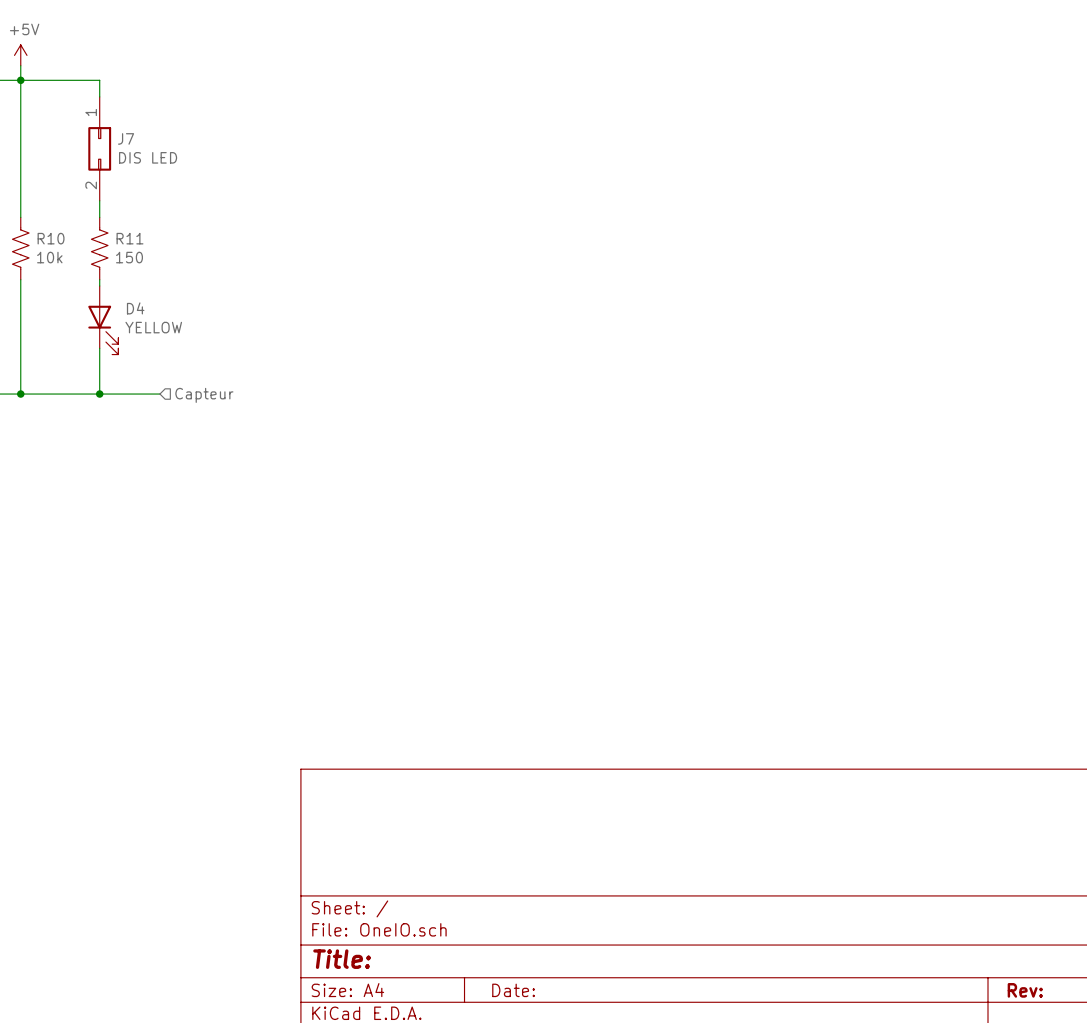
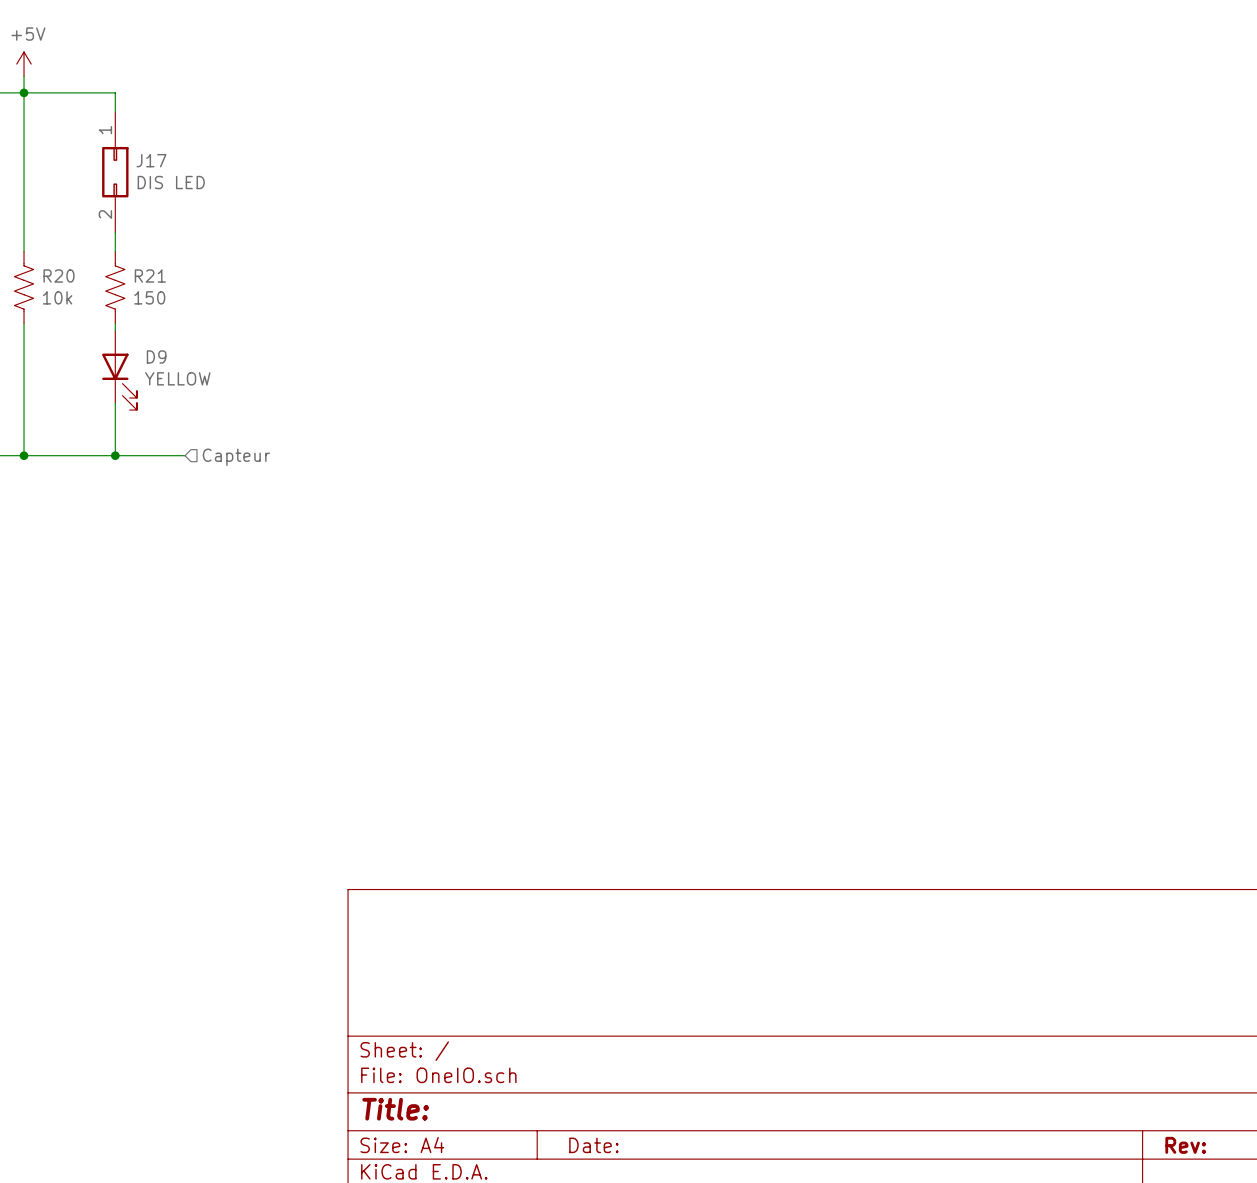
J7 name: J7 (126, 138) -> J17 (151, 160)
R10 name: R10 (51, 238) -> R20 (59, 276)
R11 name: R11 (129, 238) -> R21 (150, 276)
D4 name: D4 (135, 308) -> D9 (156, 356)

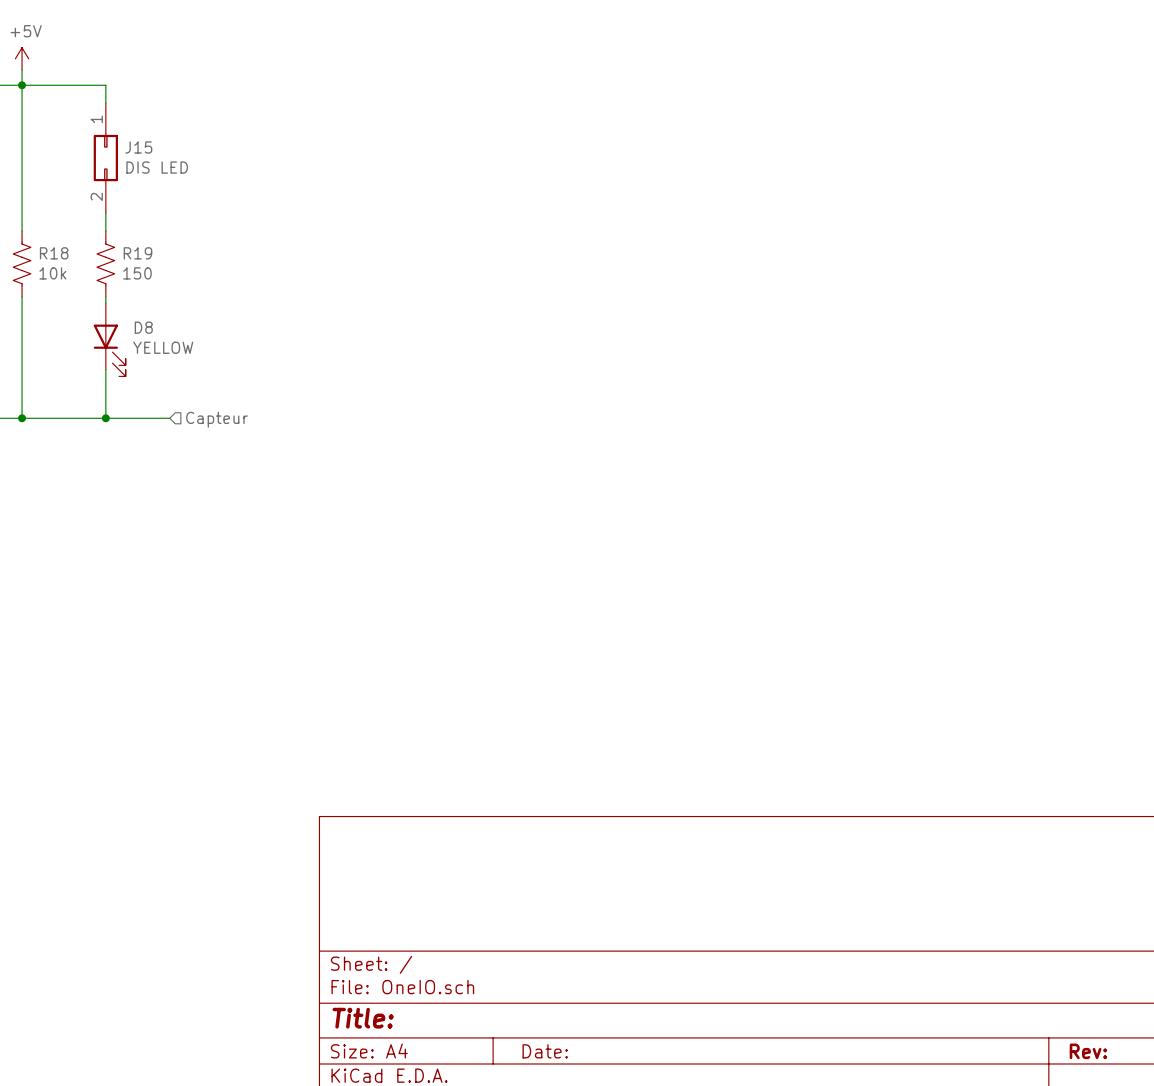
J17 name: J17 (151, 160) -> J15 (138, 147)
R20 name: R20 (59, 276) -> R18 (54, 253)
R21 name: R21 (150, 276) -> R19 (137, 253)
D9 name: D9 (156, 356) -> D8 (143, 327)

